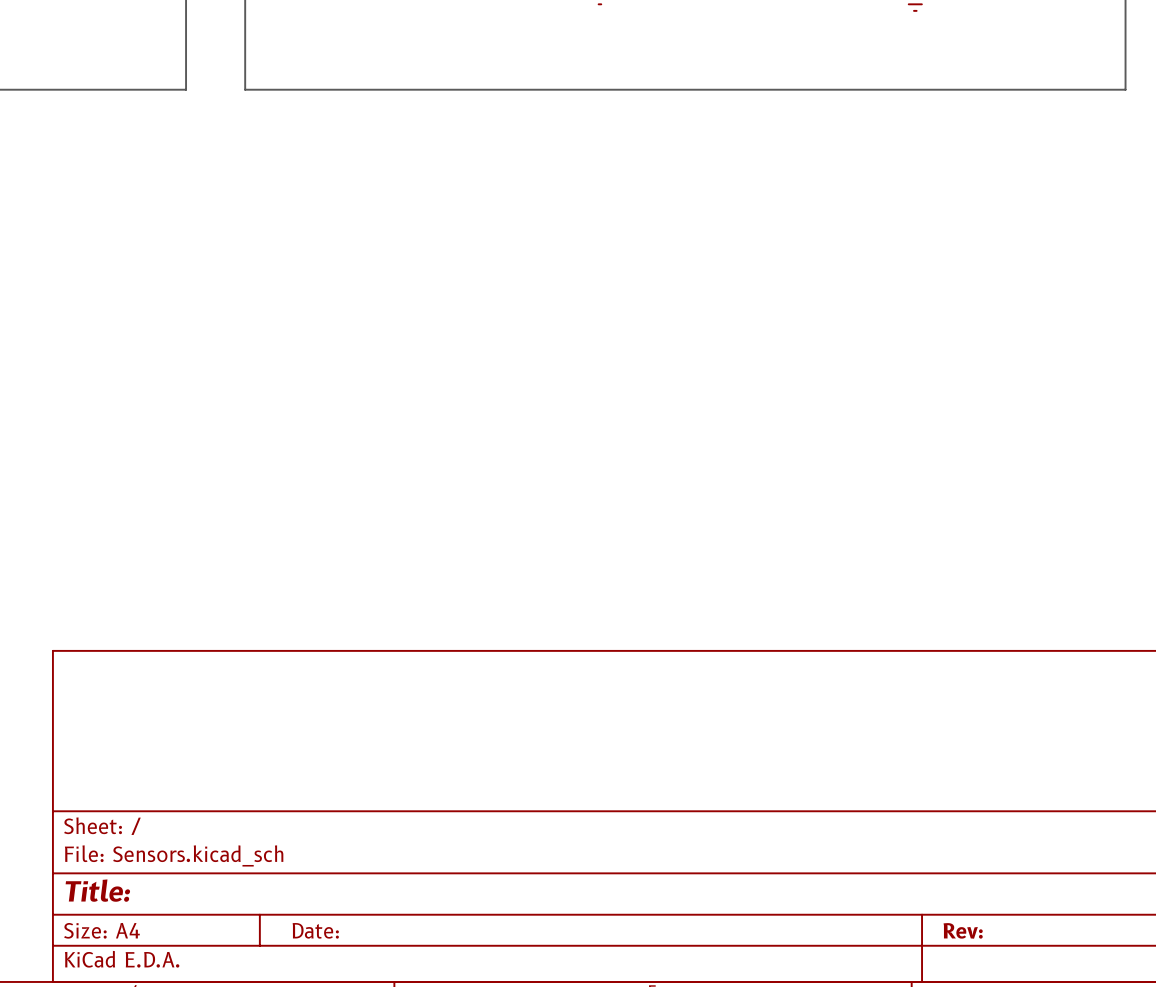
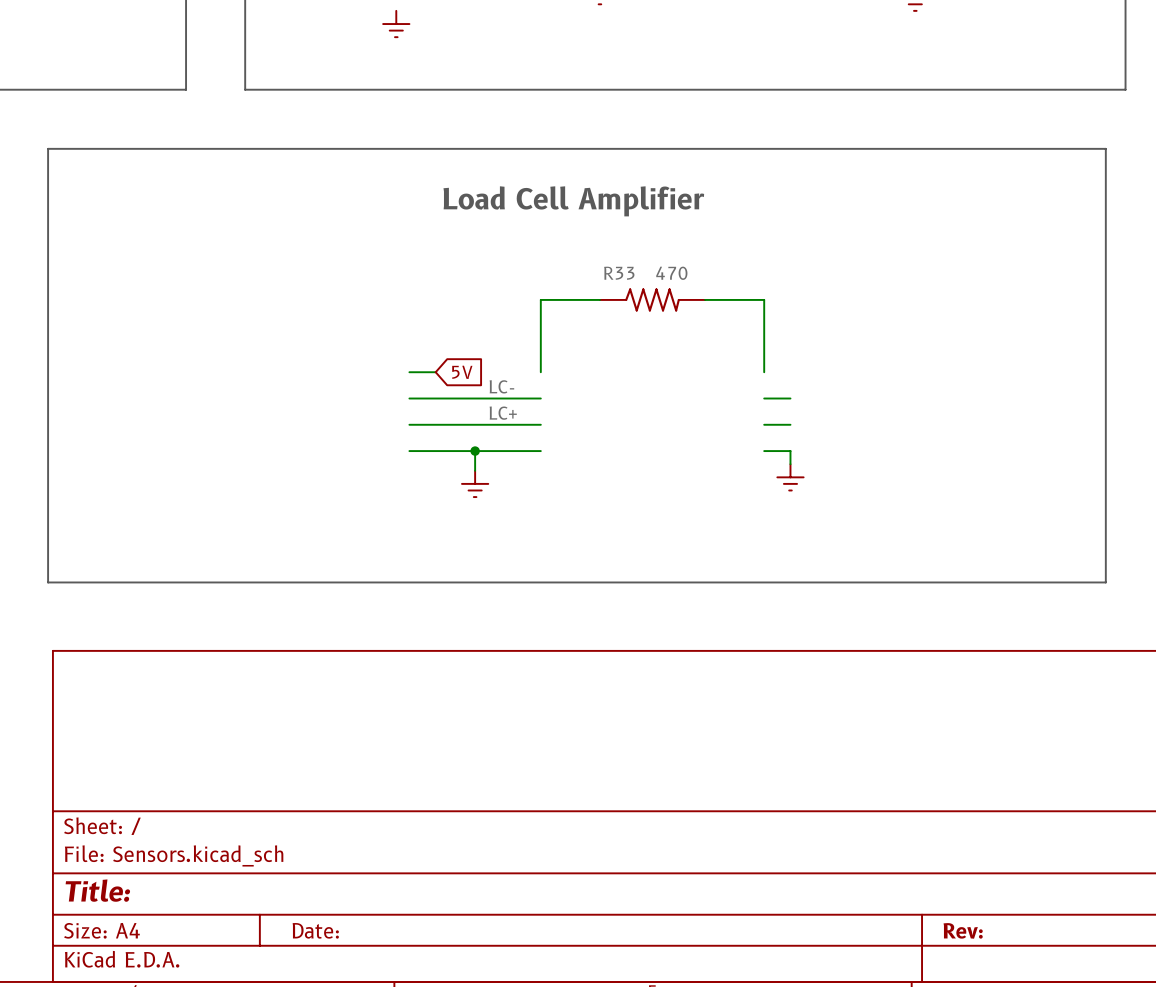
power symbol: none -> (396, 24)
line: none -> (48, 148) (1105, 148) (1105, 582) (48, 582) (48, 148)
text: none -> Load Cell Amplifier (573, 201)
wire: none -> (599, 299) (540, 299) (540, 372)
R33: none -> 470 (652, 299)
wire: none -> (705, 299) (764, 299) (764, 372)
wire: none -> (409, 372) (435, 372)
global label: none -> 5V (462, 372)
label: none -> LC- (501, 386)
wire: none -> (409, 398) (540, 398)
wire: none -> (764, 398) (790, 398)
label: none -> LC+ (503, 413)
wire: none -> (409, 424) (540, 424)
wire: none -> (764, 424) (790, 424)
wire: none -> (409, 451) (540, 451)
wire: none -> (475, 451) (475, 470)
junction: none -> (475, 451)
wire: none -> (764, 451) (790, 451) (790, 464)
power symbol: none -> (790, 477)
power symbol: none -> (475, 483)

